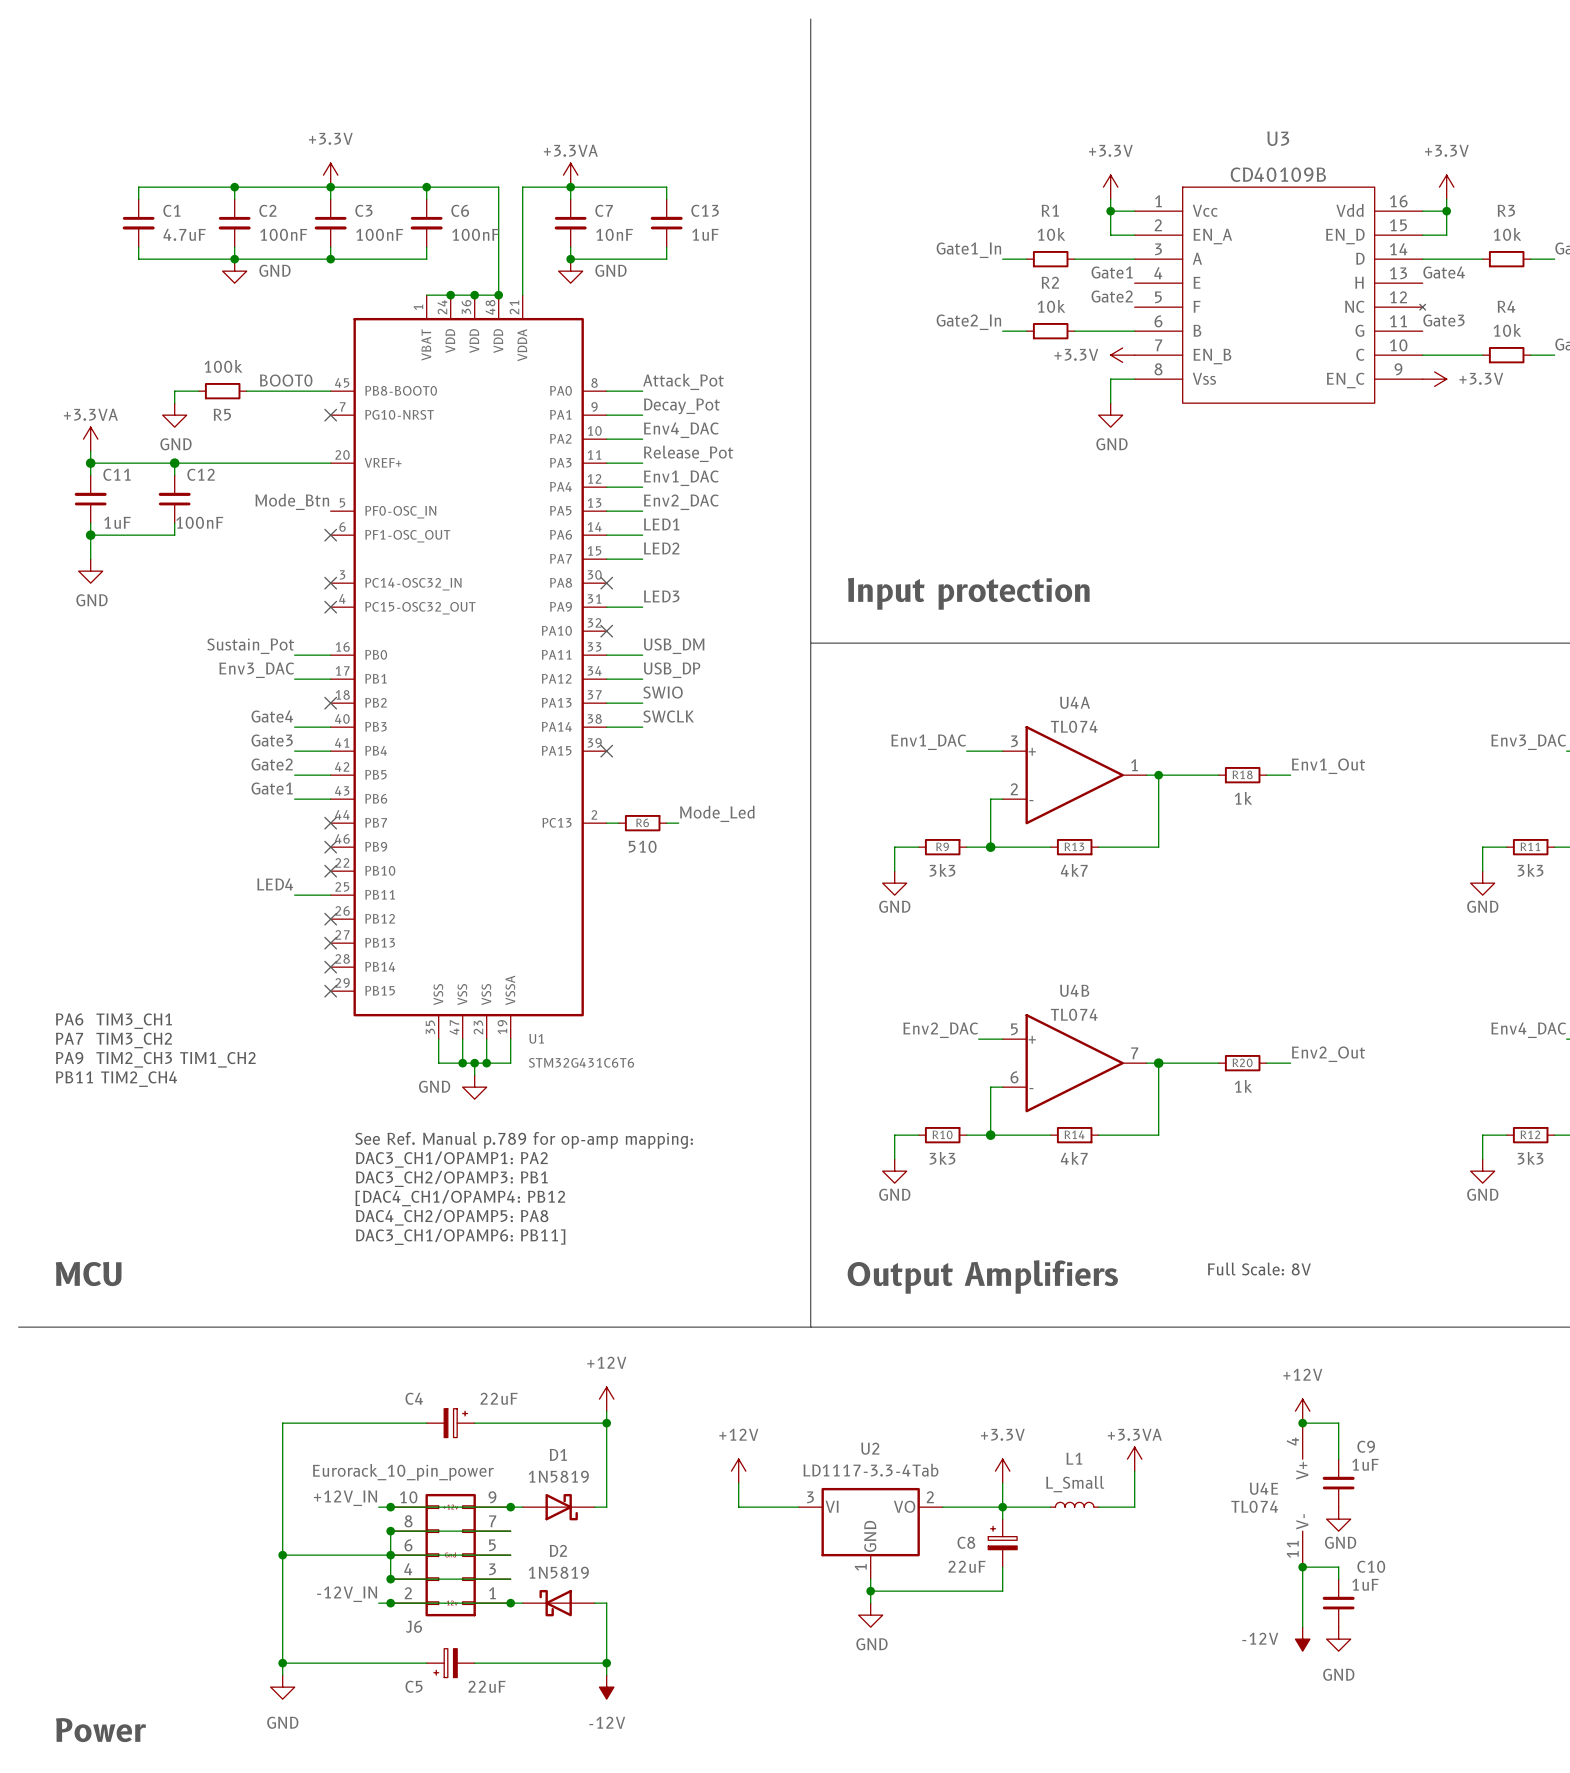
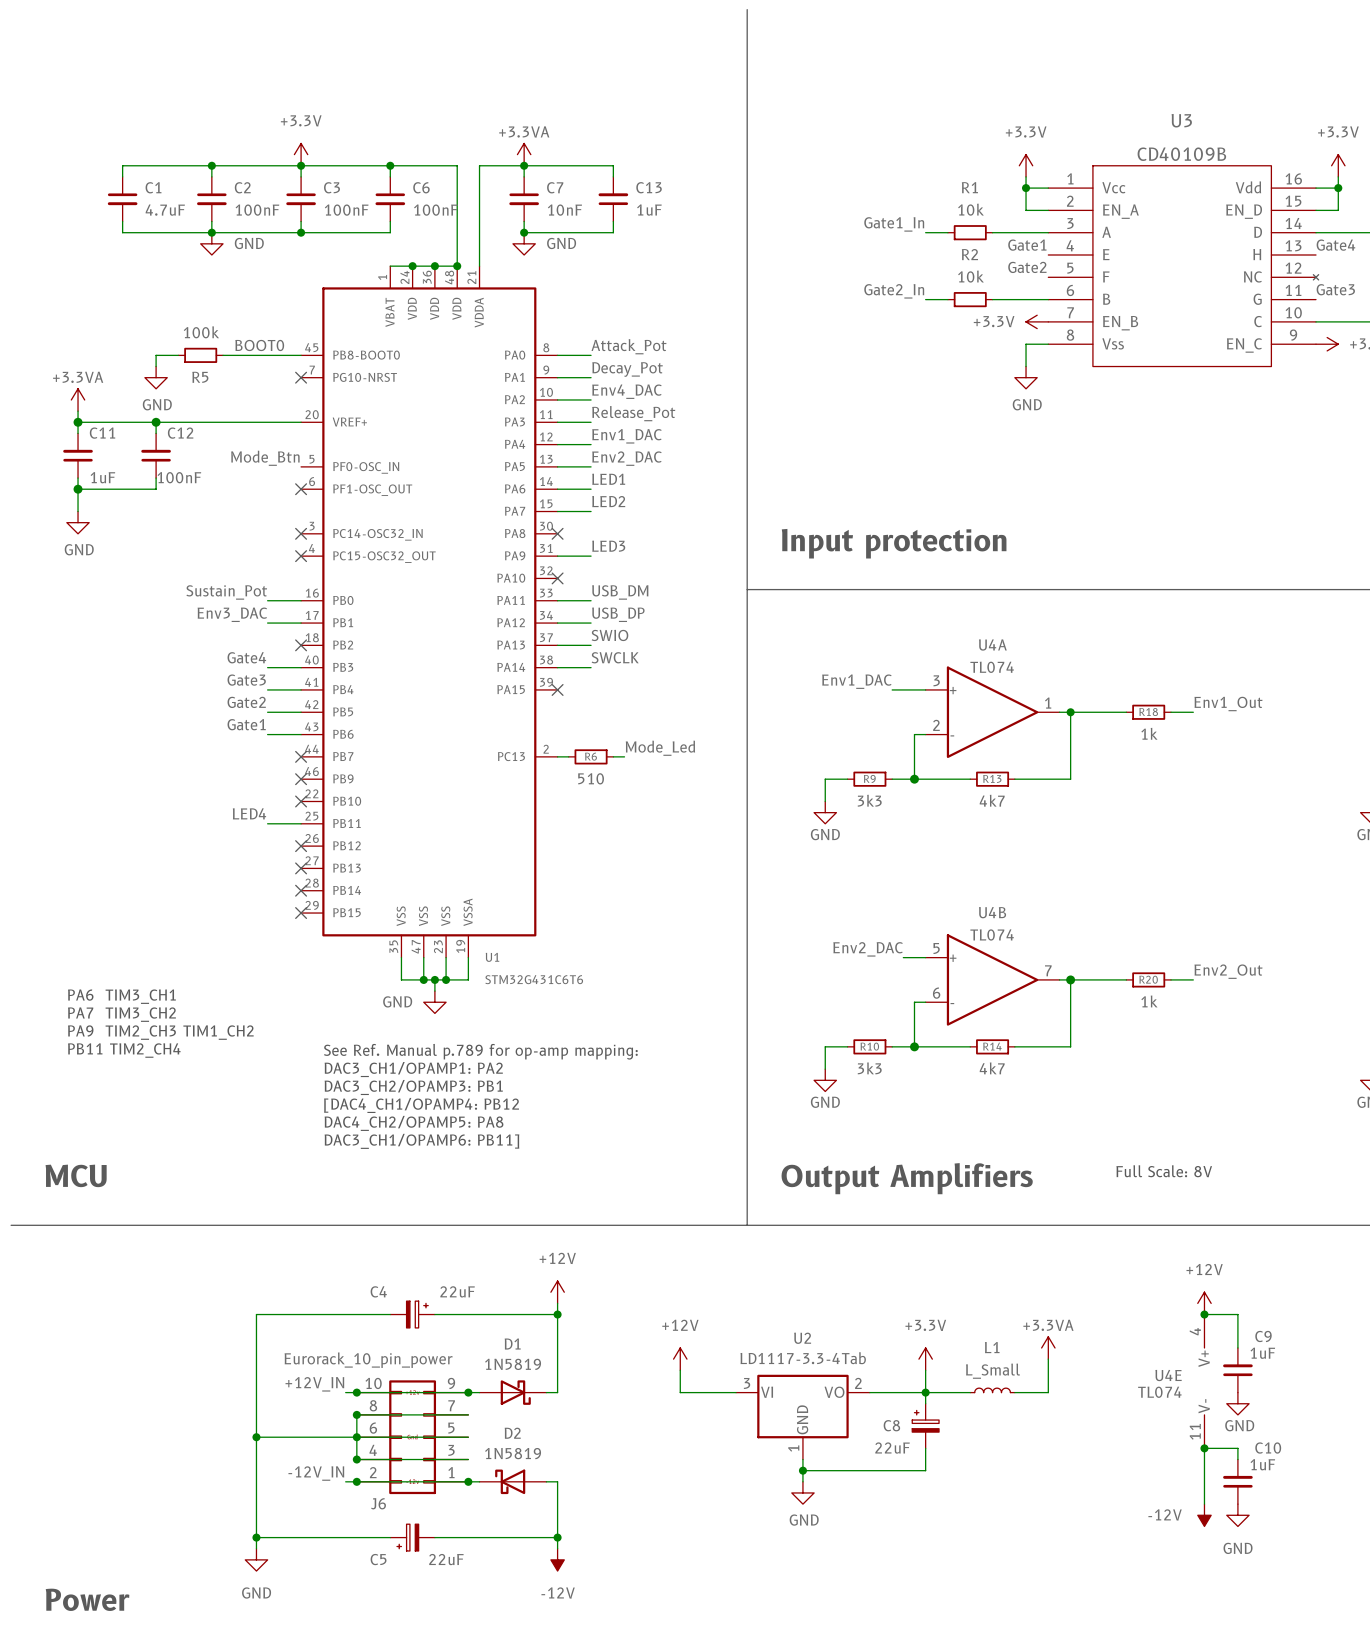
text position: PA6 TIM3_CH1 (113, 1021) -> PA6 TIM3_CH1 (121, 996)
text position: PA7 TIM3_CH2 (113, 1040) -> PA7 TIM3_CH2 (121, 1014)
text position: PA9 TIM2_CH3 TIM1_CH2 (155, 1059) -> PA9 TIM2_CH3 TIM1_CH2 (160, 1032)
text position: PB11 TIM2_CH4 (116, 1079) -> PB11 TIM2_CH4 (124, 1050)

